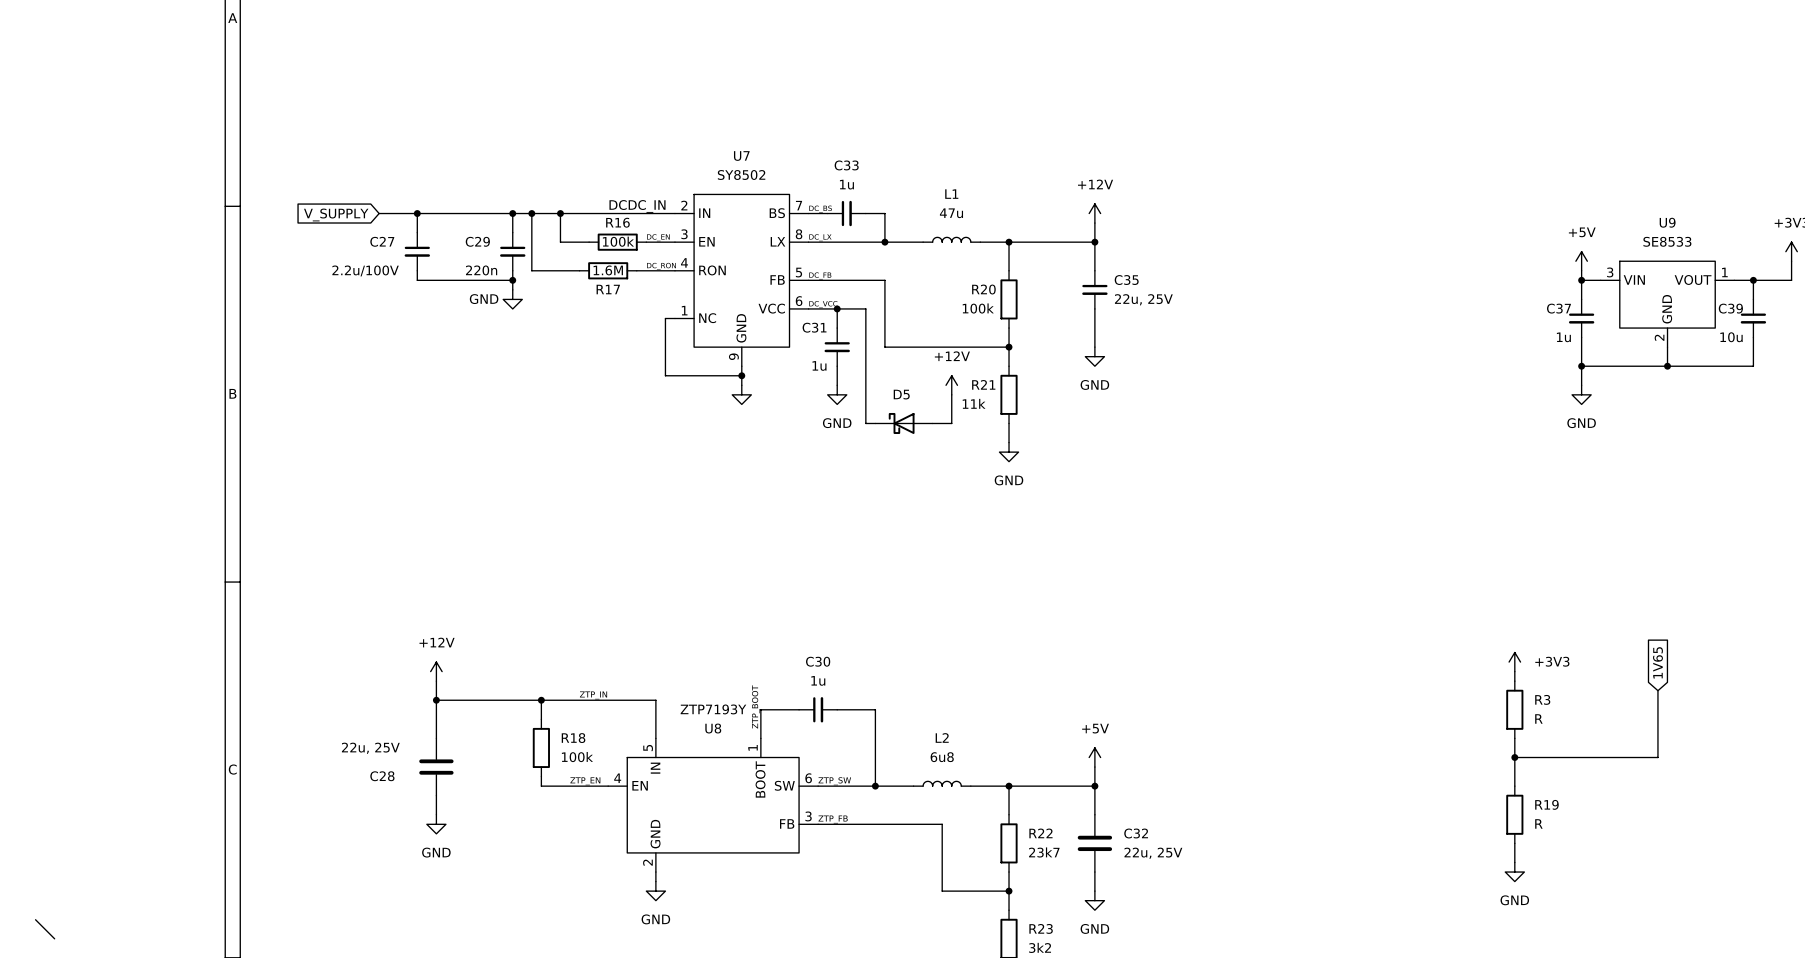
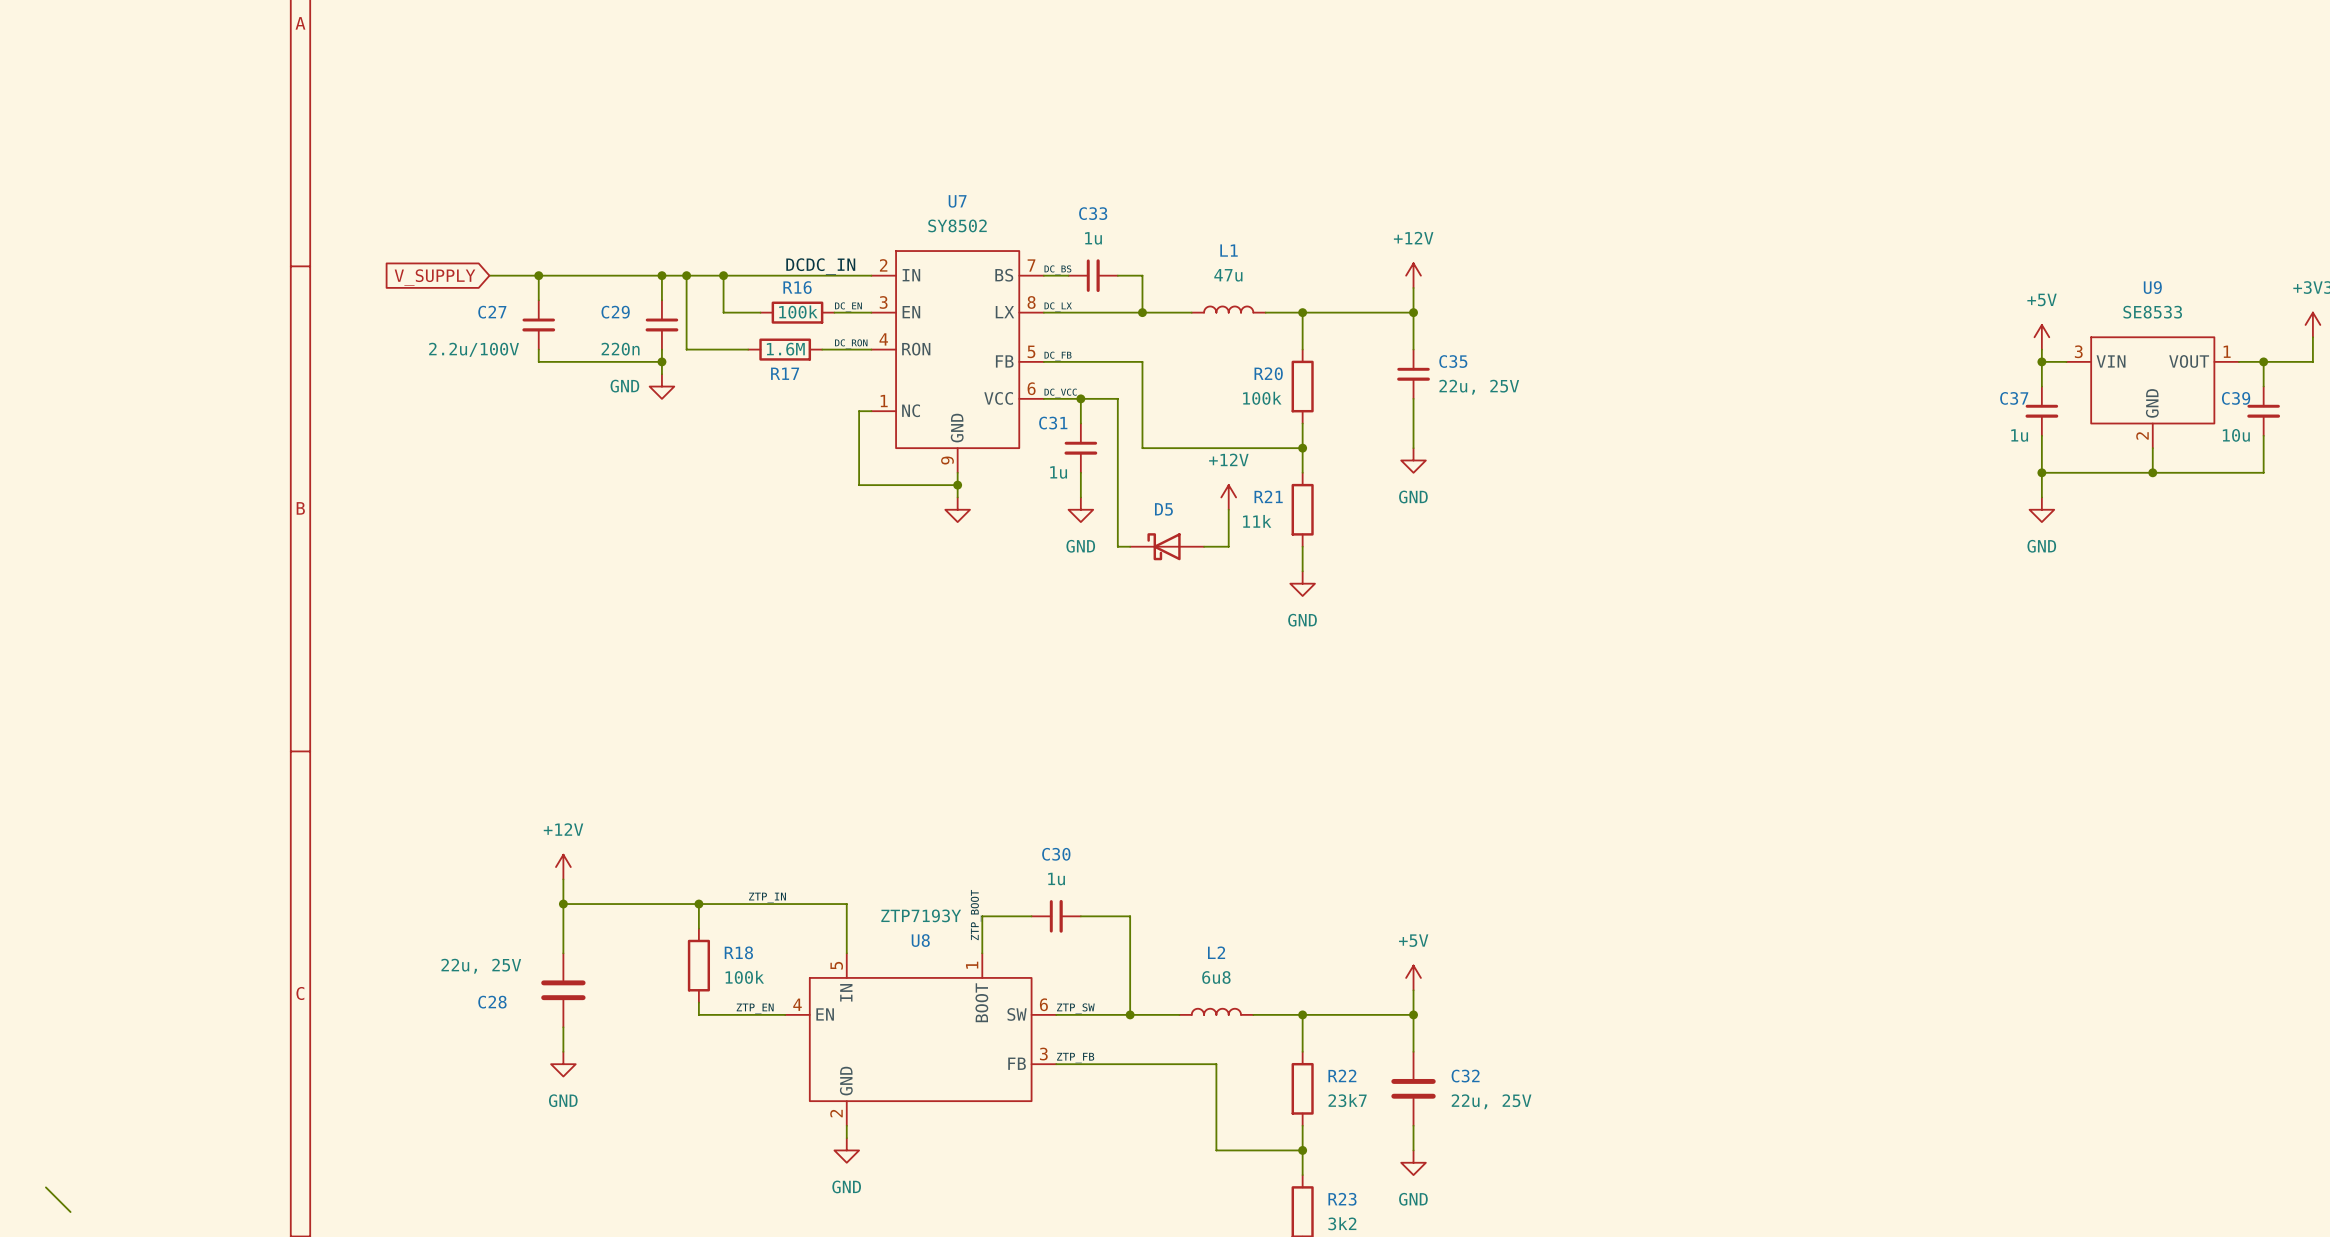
power symbol: +3V3 (1514, 662) -> none
global label: 1V65 (1657, 662) -> none
wire: (1514, 671) (1514, 681) -> none
wire: (1657, 690) (1657, 757) (1514, 757) -> none
R3: R (1514, 709) -> none
wire: (1514, 738) (1514, 786) -> none
junction: (1514, 757) -> none
R19: R (1514, 814) -> none
wire: (1514, 843) (1514, 862) -> none
power symbol: GND (1514, 872) -> none

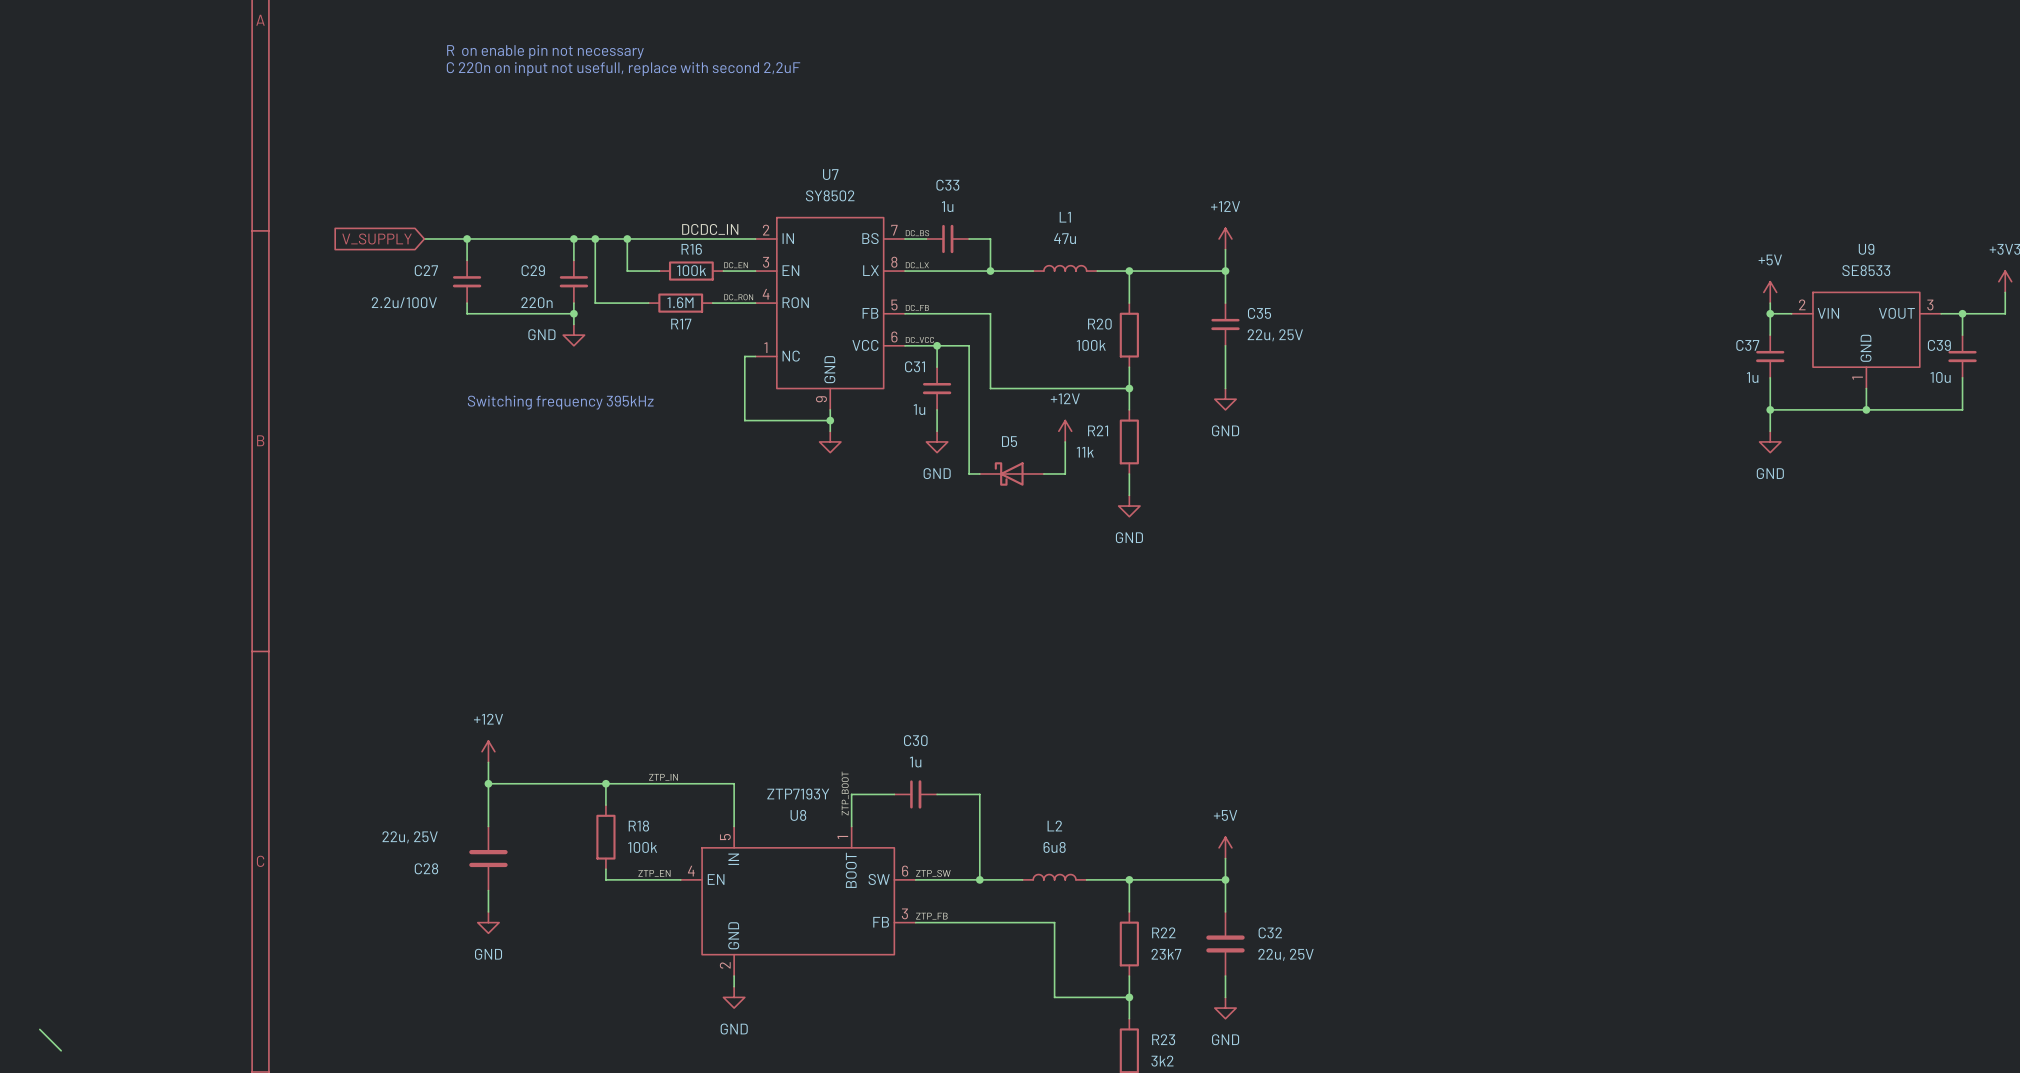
text: none -> R on enable pin not necessary (545, 51)
text: none -> C 220n on input not usefull, replace with second 2,2uF (623, 69)
U9 pin number: 3 (2078, 351) -> 2 (1802, 304)
U9 pin number: 1 (2227, 351) -> 3 (1930, 305)
U9 pin number: 2 (2142, 435) -> 1 (1857, 378)
text: none -> Switching frequency 395kHz (560, 402)

